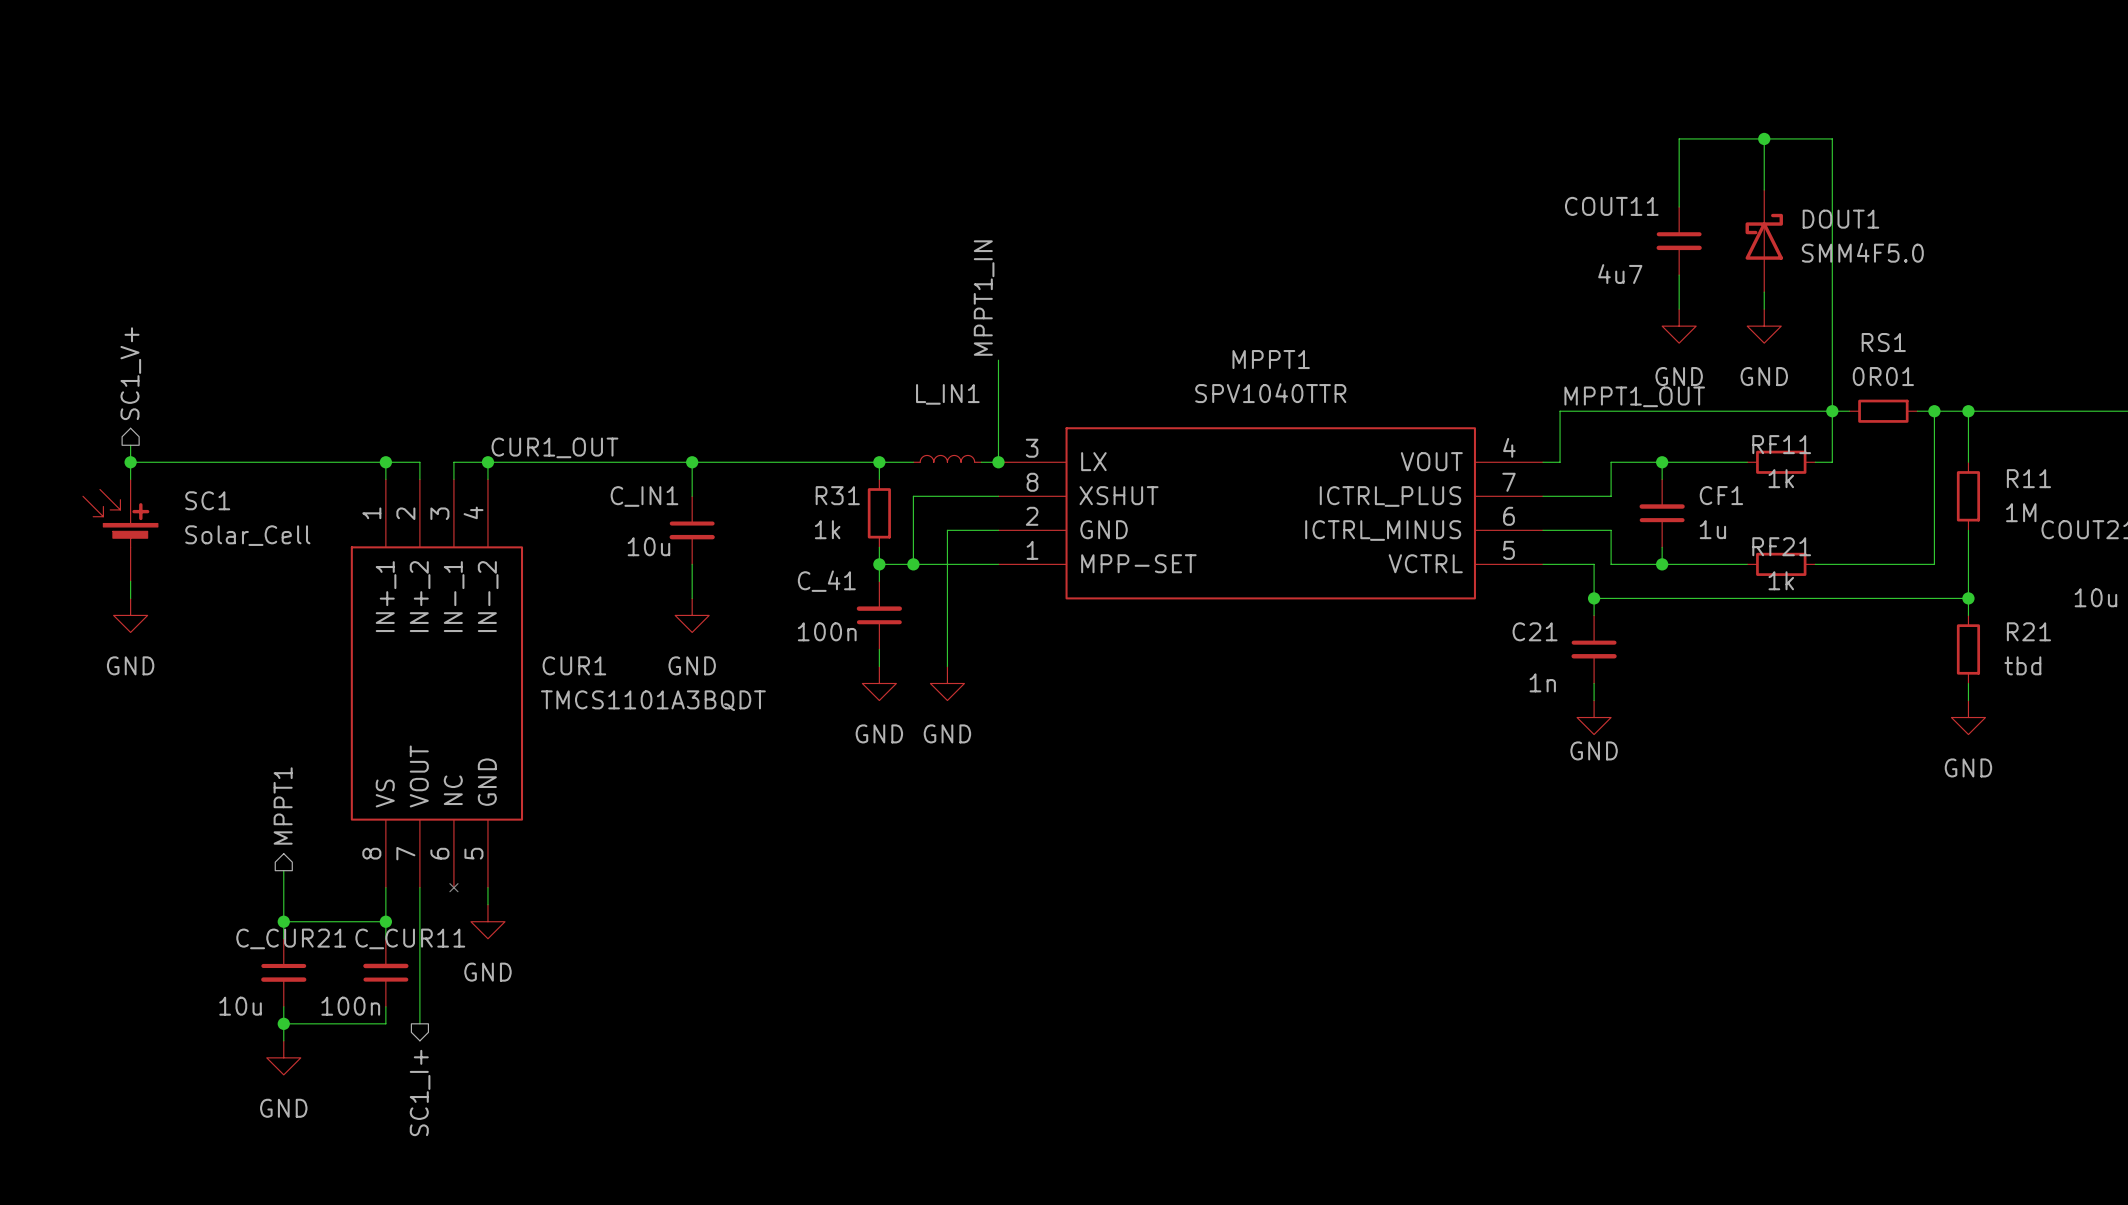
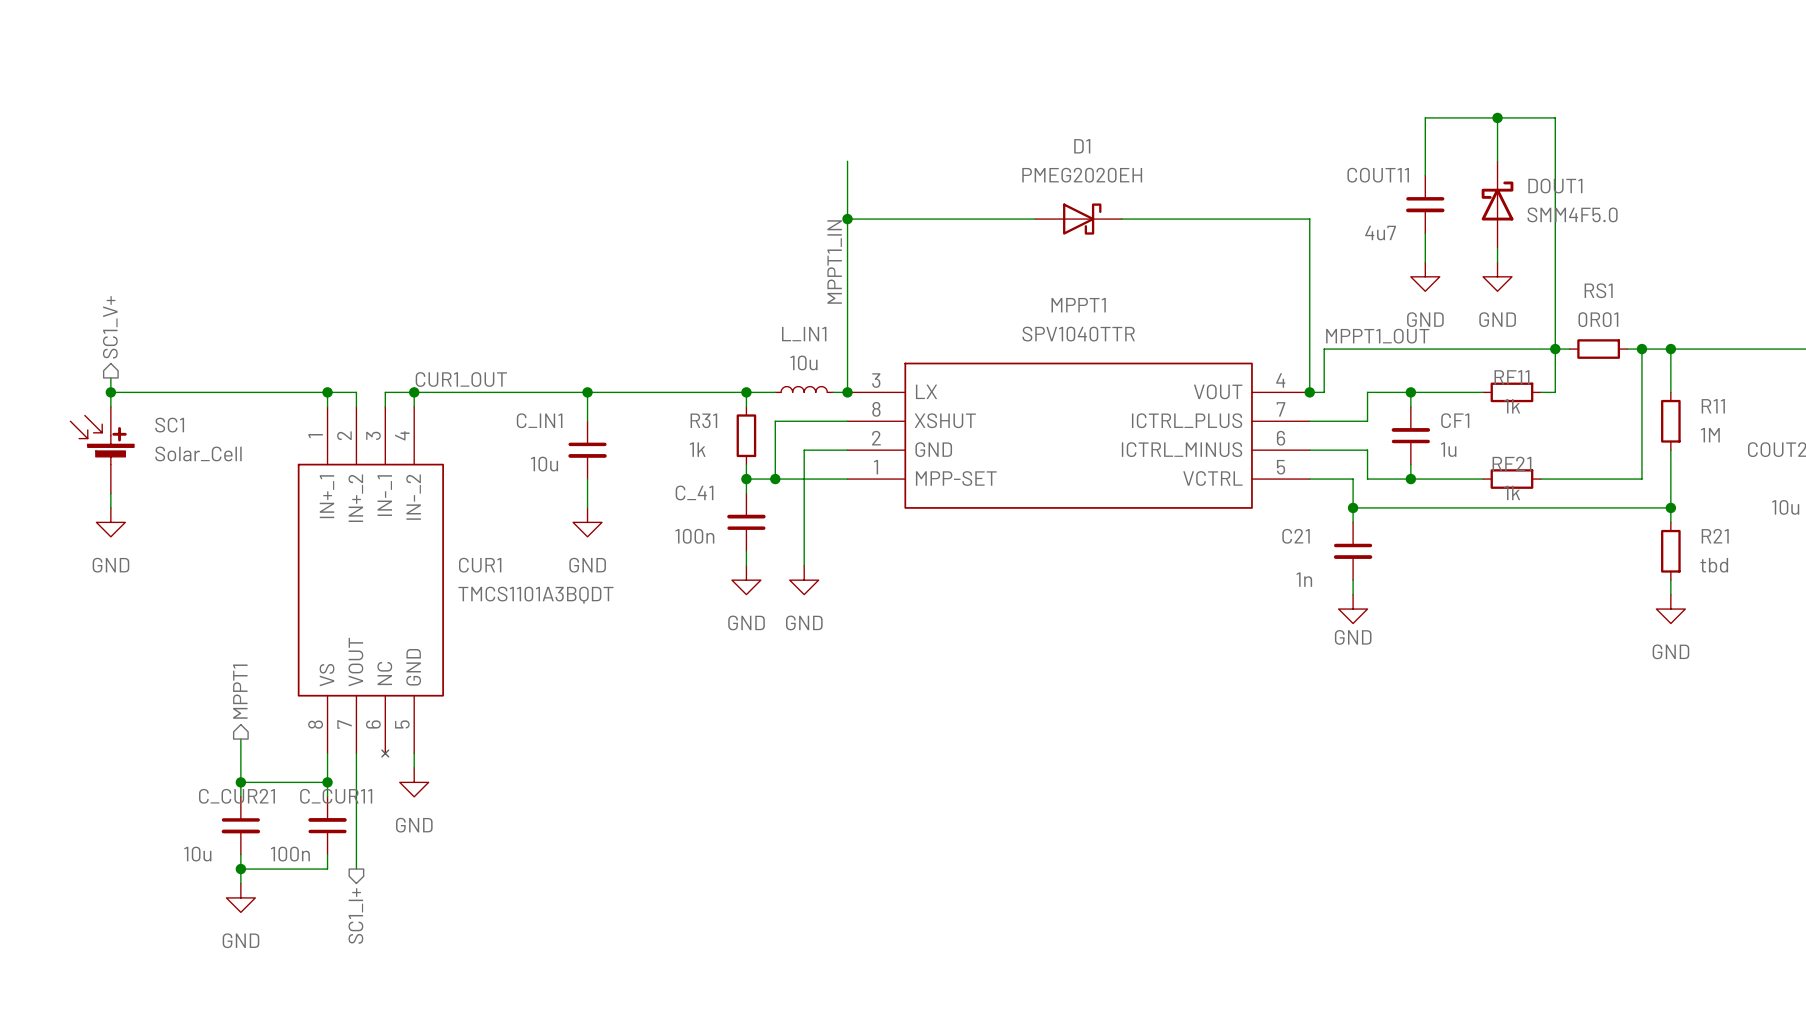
wire: none -> (847, 161) (847, 305)
wire: none -> (847, 219) (1035, 219)
junction: none -> (847, 219)
D1: none -> PMEG2020EH (1078, 219)
wire: none -> (1121, 219) (1309, 219) (1309, 392)
L_IN1 value: none -> 10u (803, 362)
junction: none -> (1309, 392)

